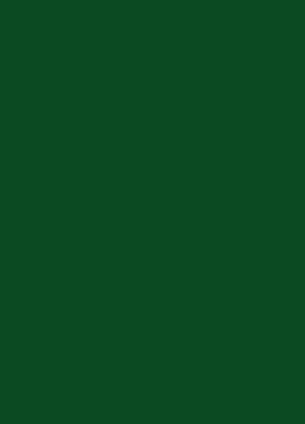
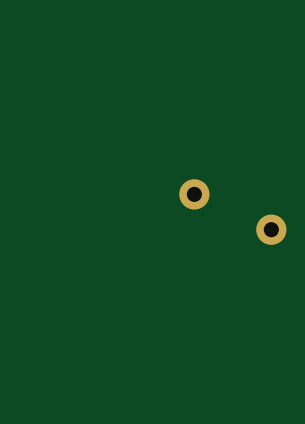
via: none -> (194, 194)
via: none -> (271, 229)

